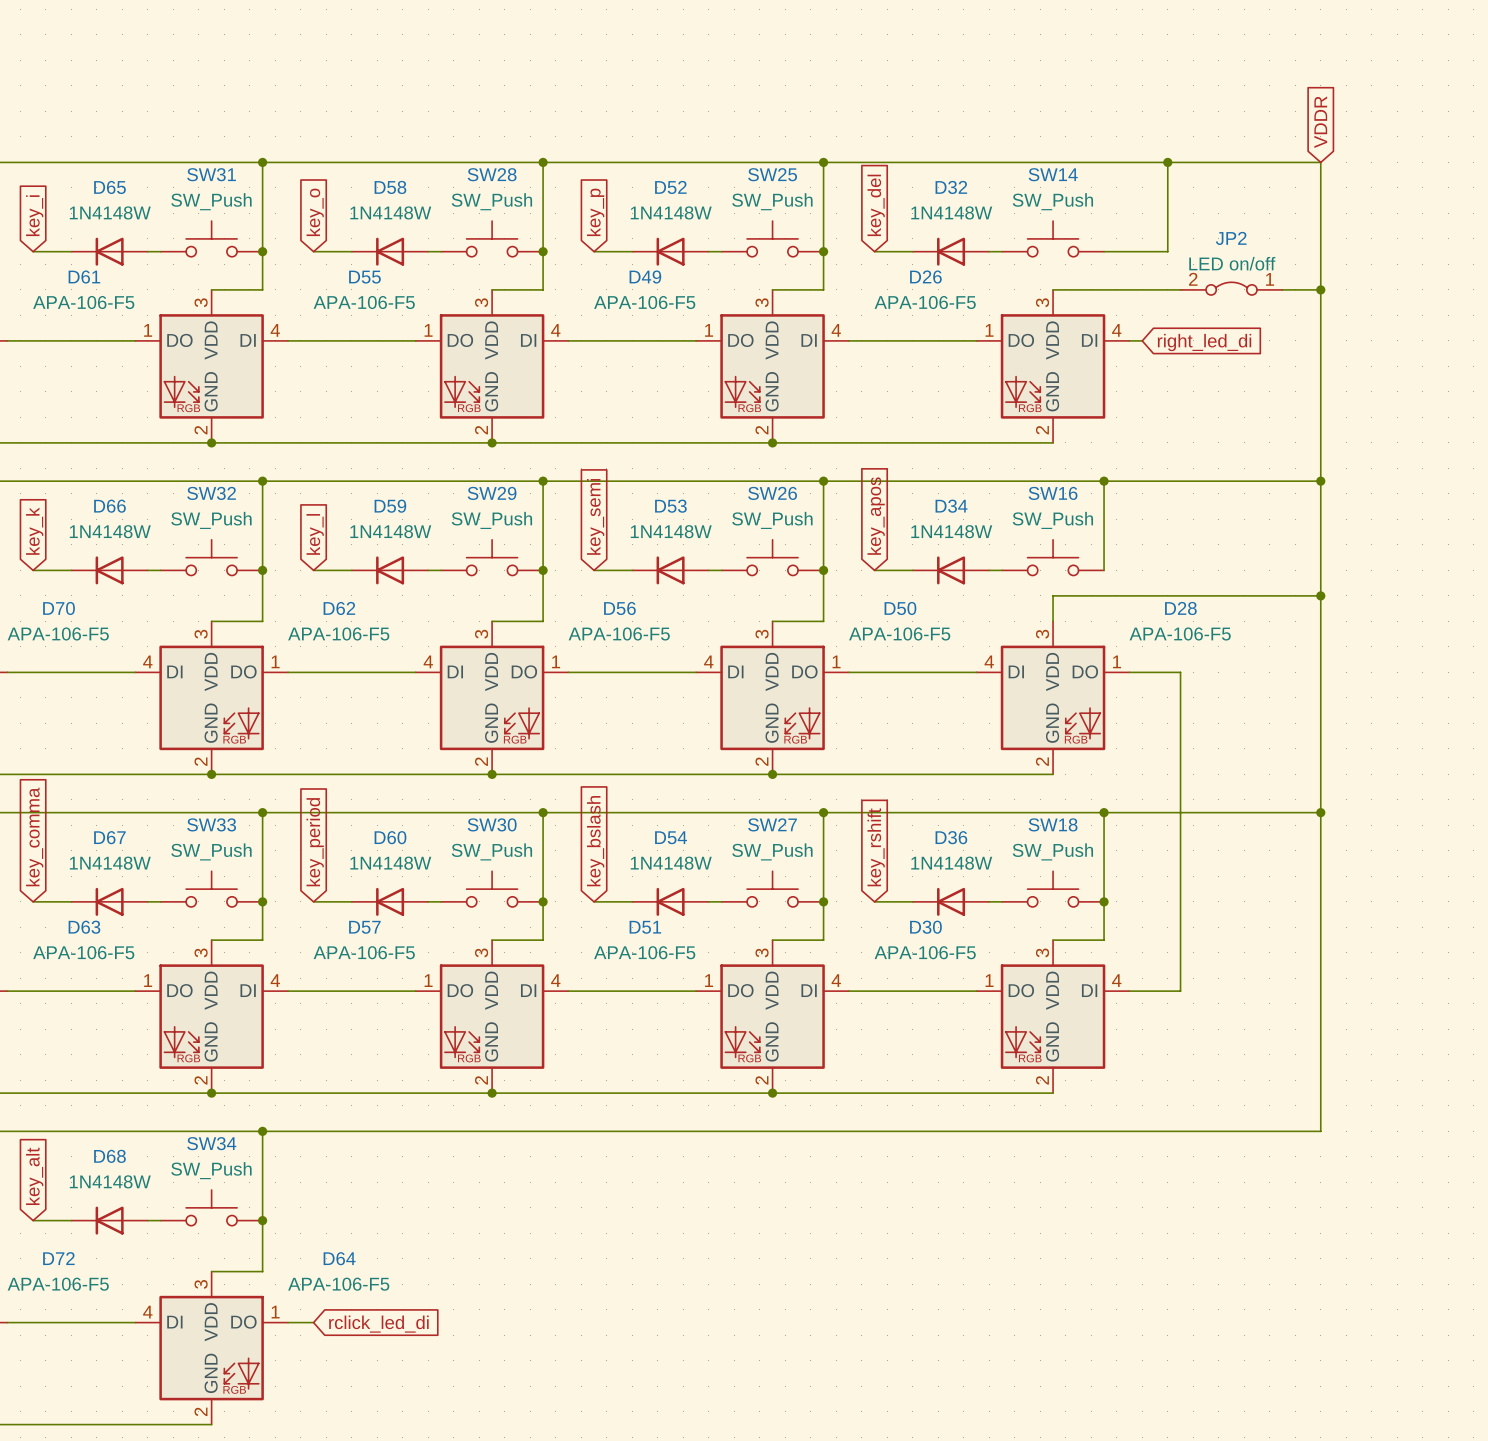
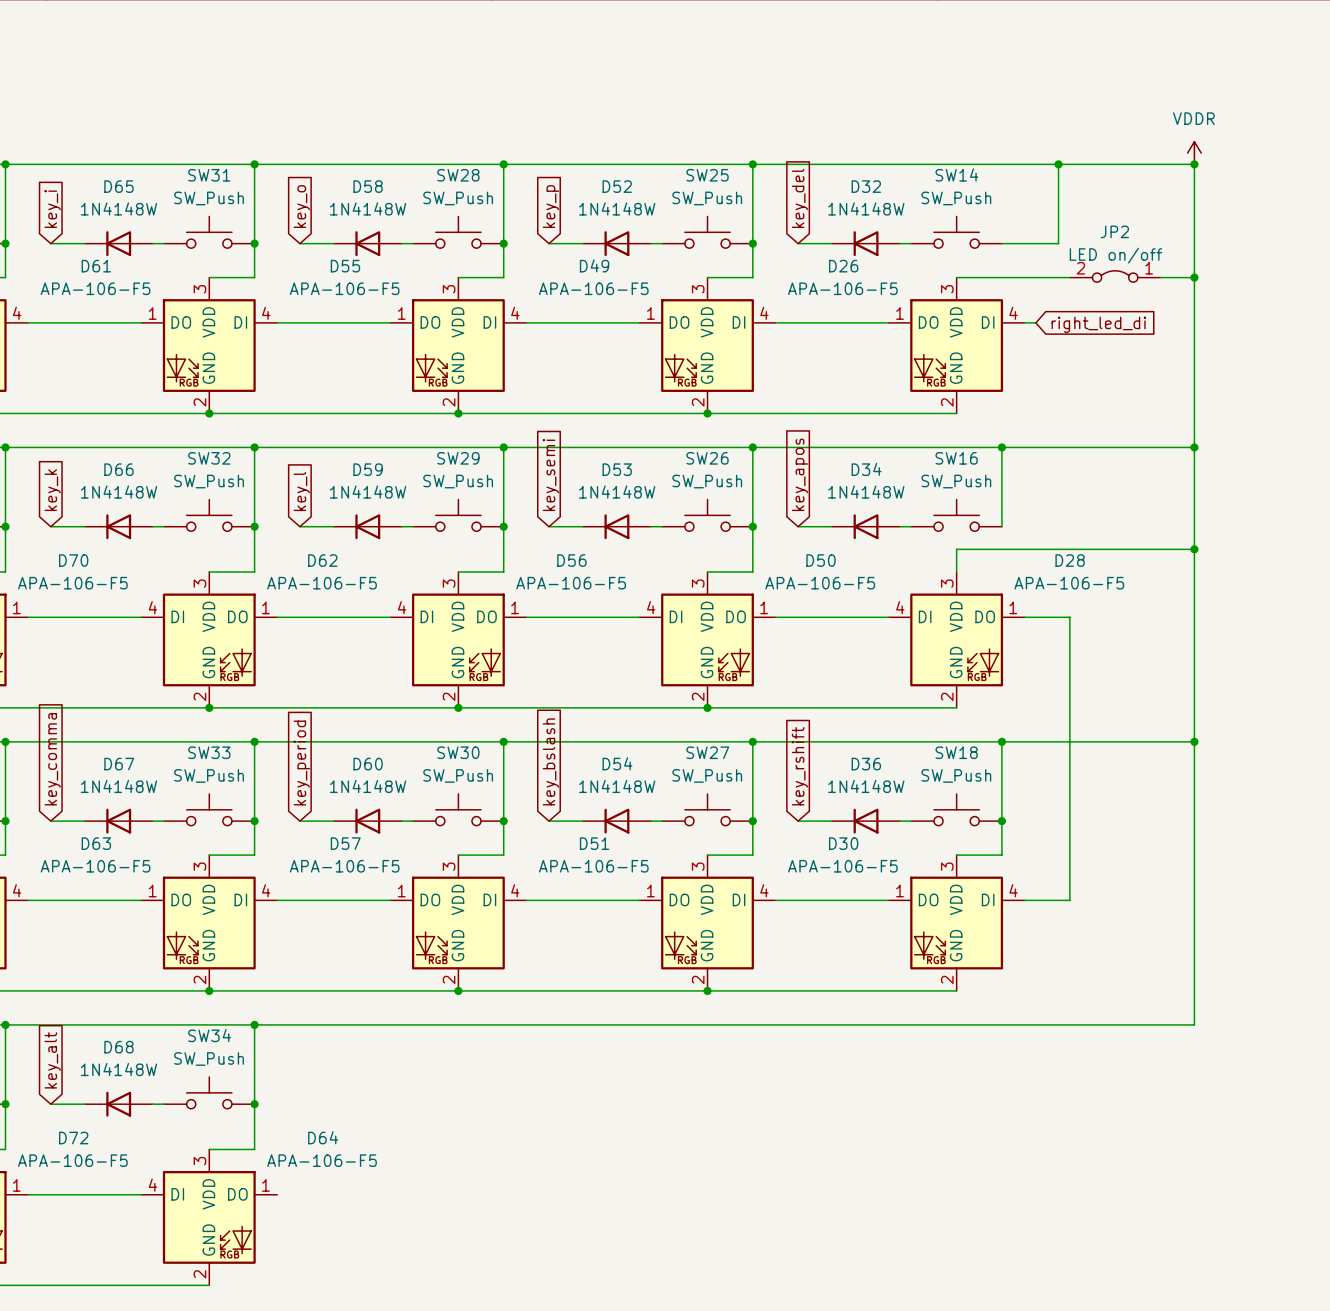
global label: VDDR (1320, 122) -> none
power symbol: none -> VDDR (1194, 153)
junction: none -> (1194, 164)
wire: (288, 1322) (313, 1322) -> none
global label: rclick_led_di (378, 1324) -> none

